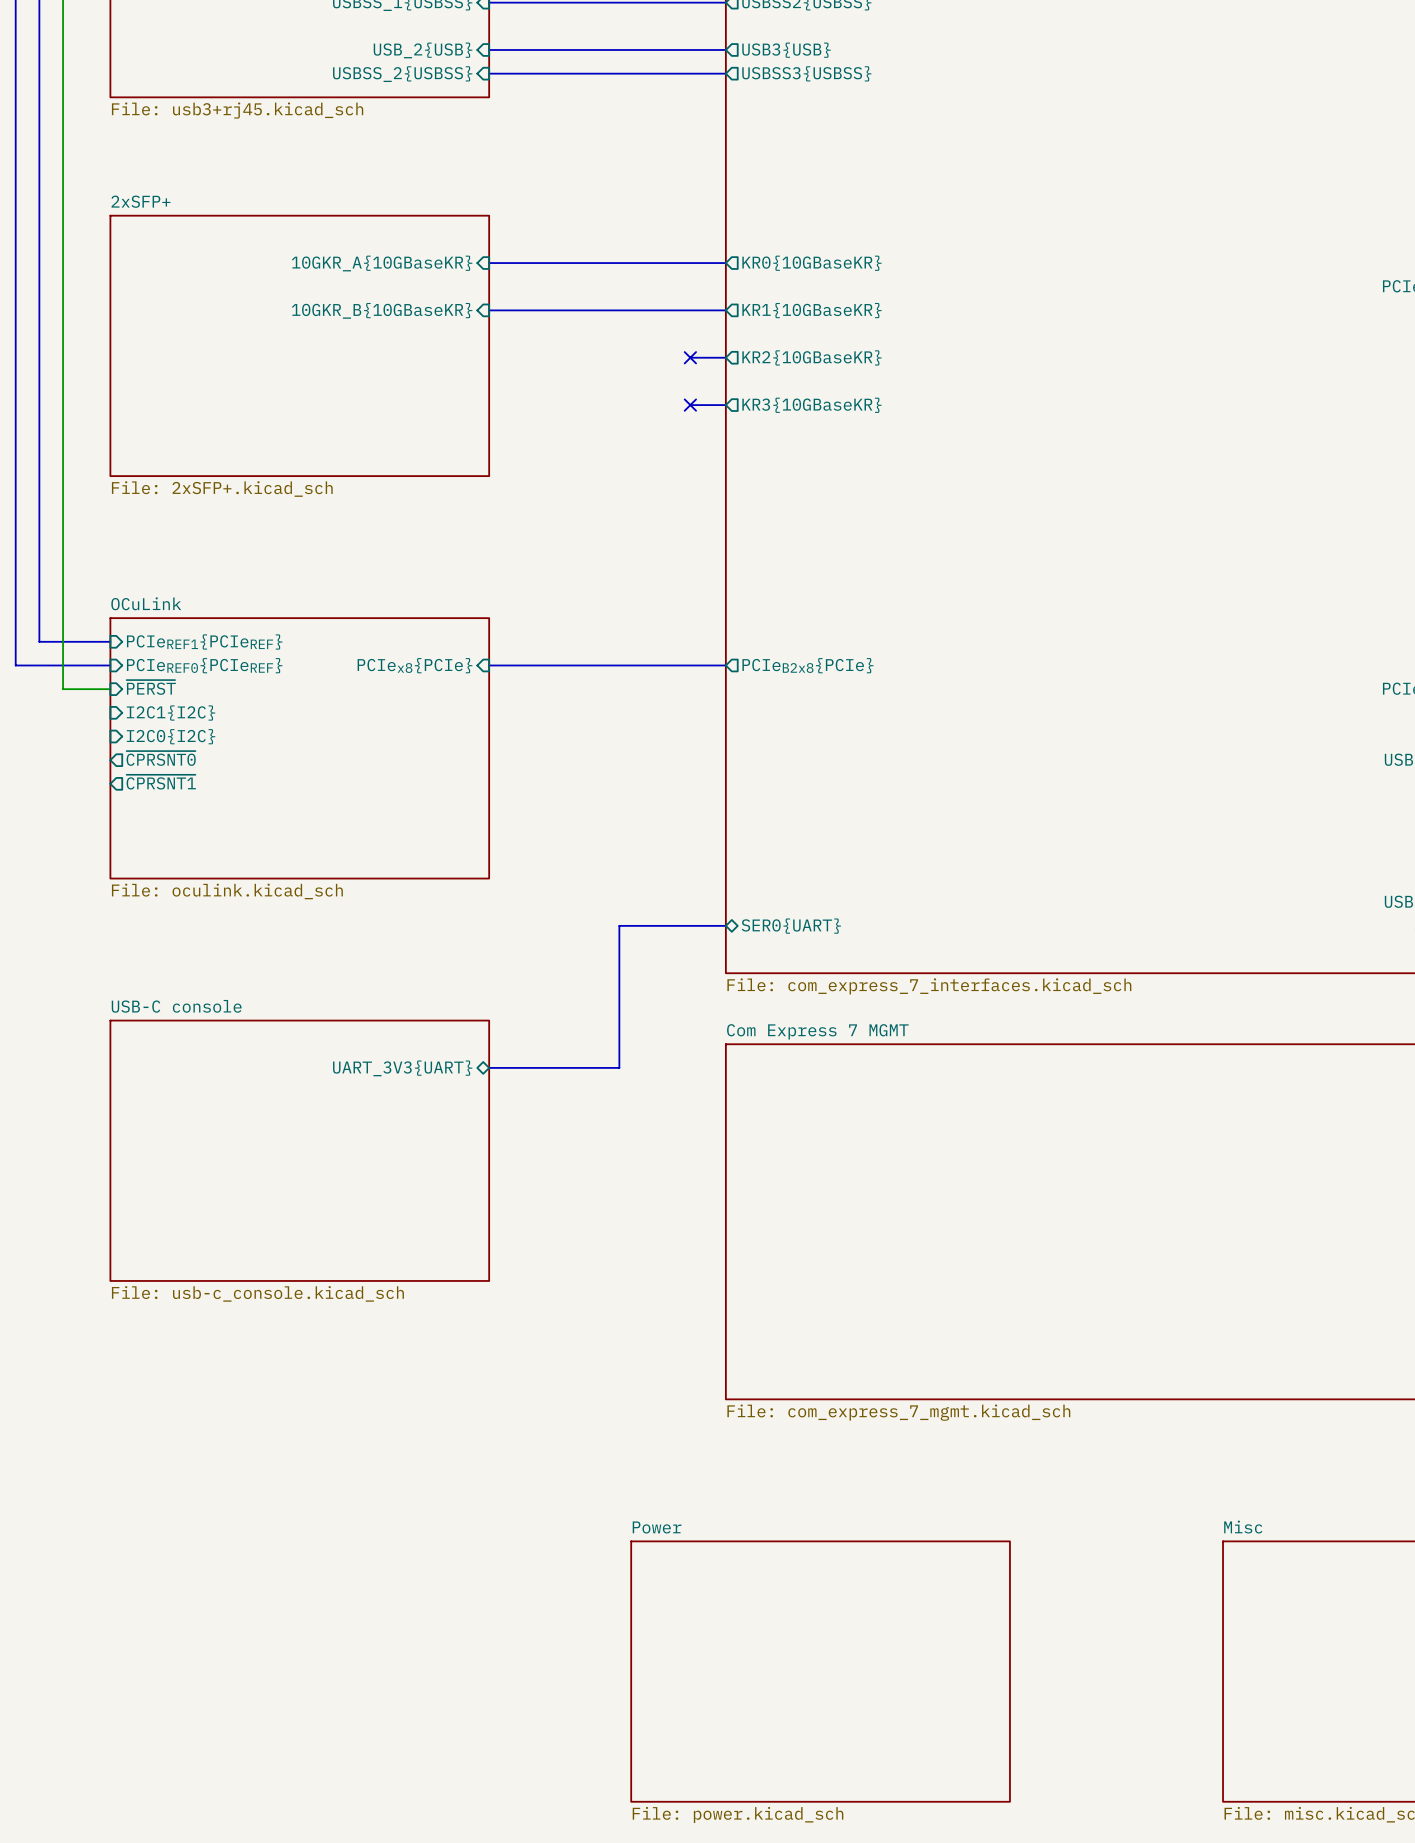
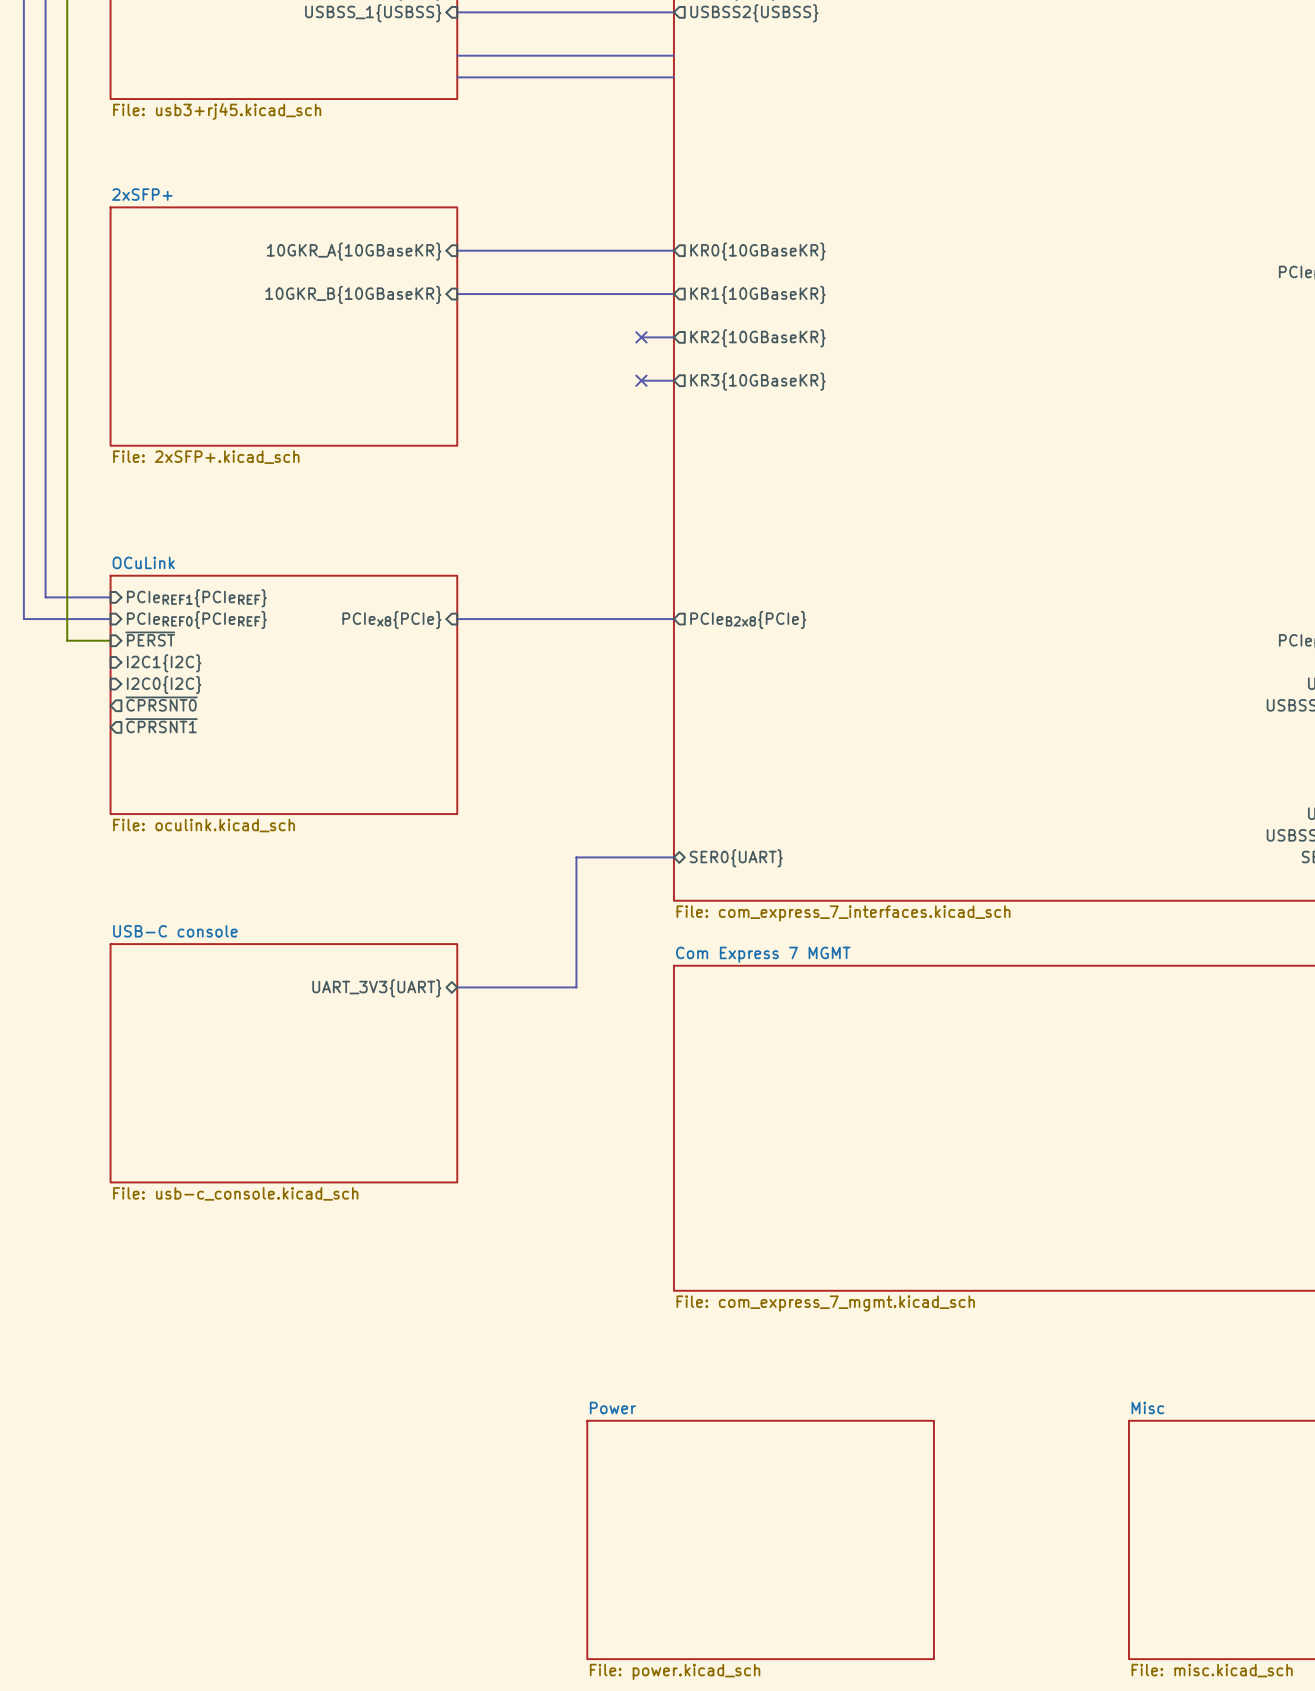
sheet pin: USB_2{USB} (423, 50) -> none
sheet pin: USB3{USB} (786, 50) -> none
sheet pin: USBSS3{USBSS} (806, 73) -> none
sheet pin: USBSS_2{USBSS} (402, 74) -> none

